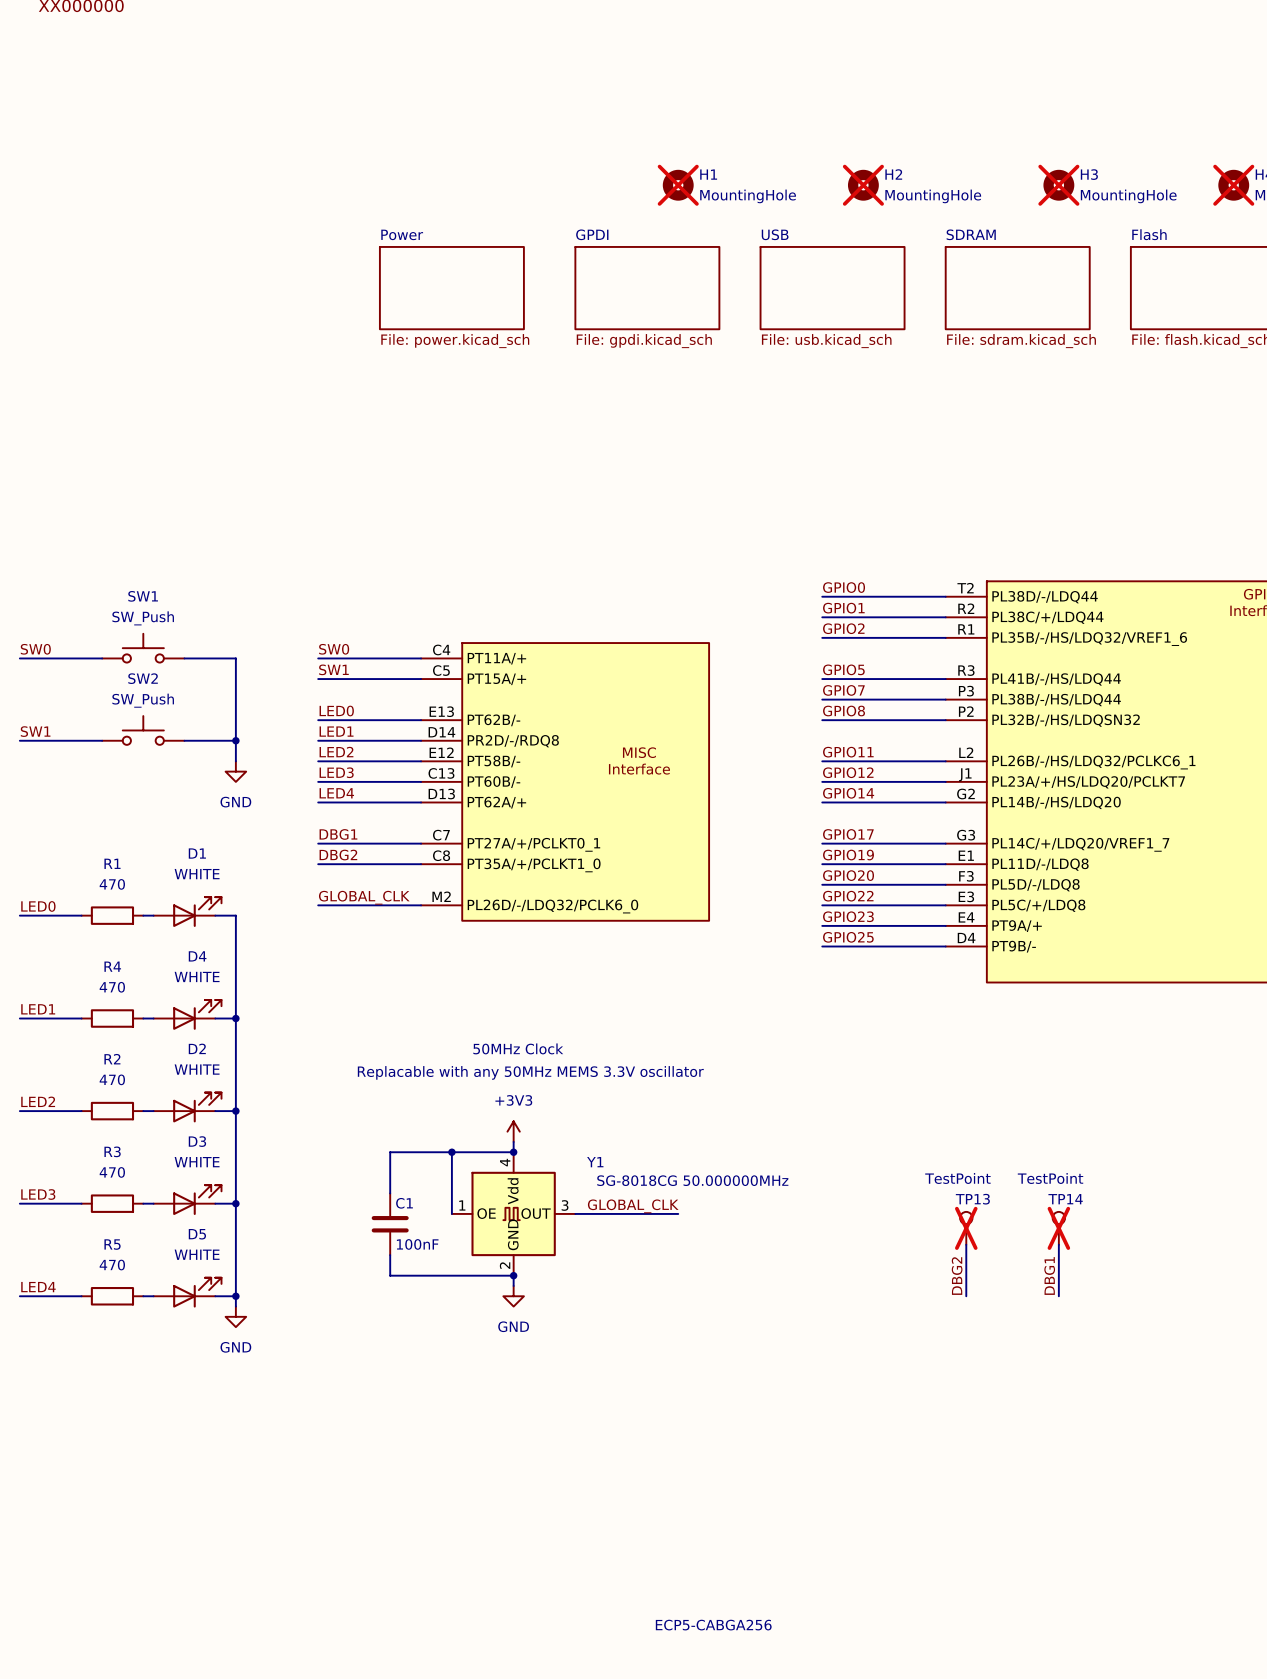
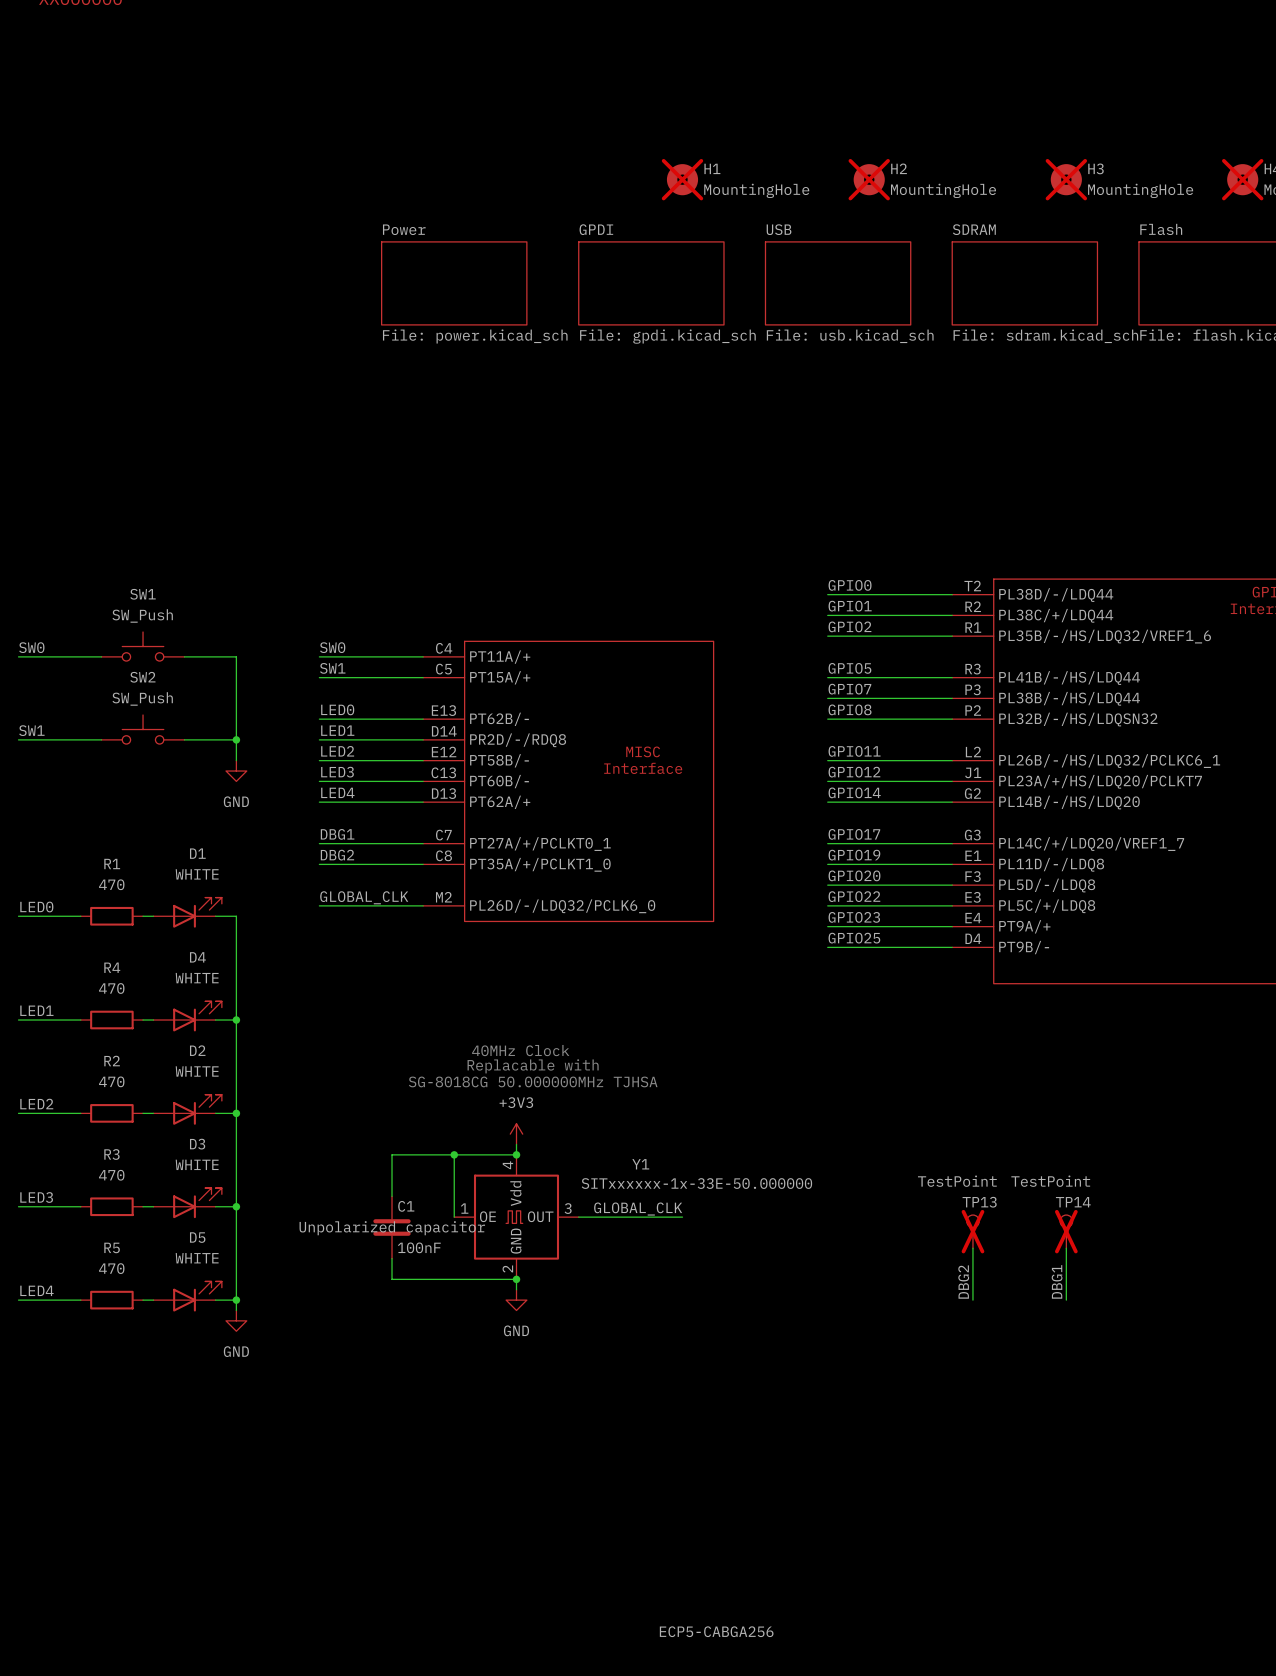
text: 50MHz Clock (518, 1048) -> 40MHz Clock (520, 1050)
text: none -> Replacable with (533, 1066)
text: Replacable with any 50MHz MEMS 3.3V oscillator (530, 1072) -> none
text: none -> SG-8018CG 50.000000MHz TJHSA (533, 1081)
Y1 name position: Y1 (595, 1162) -> Y1 (640, 1164)
Y1 value: SG-8018CG 50.000000MHz (692, 1180) -> SITxxxxxx-1x-33E-50.000000 (696, 1183)
C1 text: none -> Unpolarized capacitor (392, 1228)

